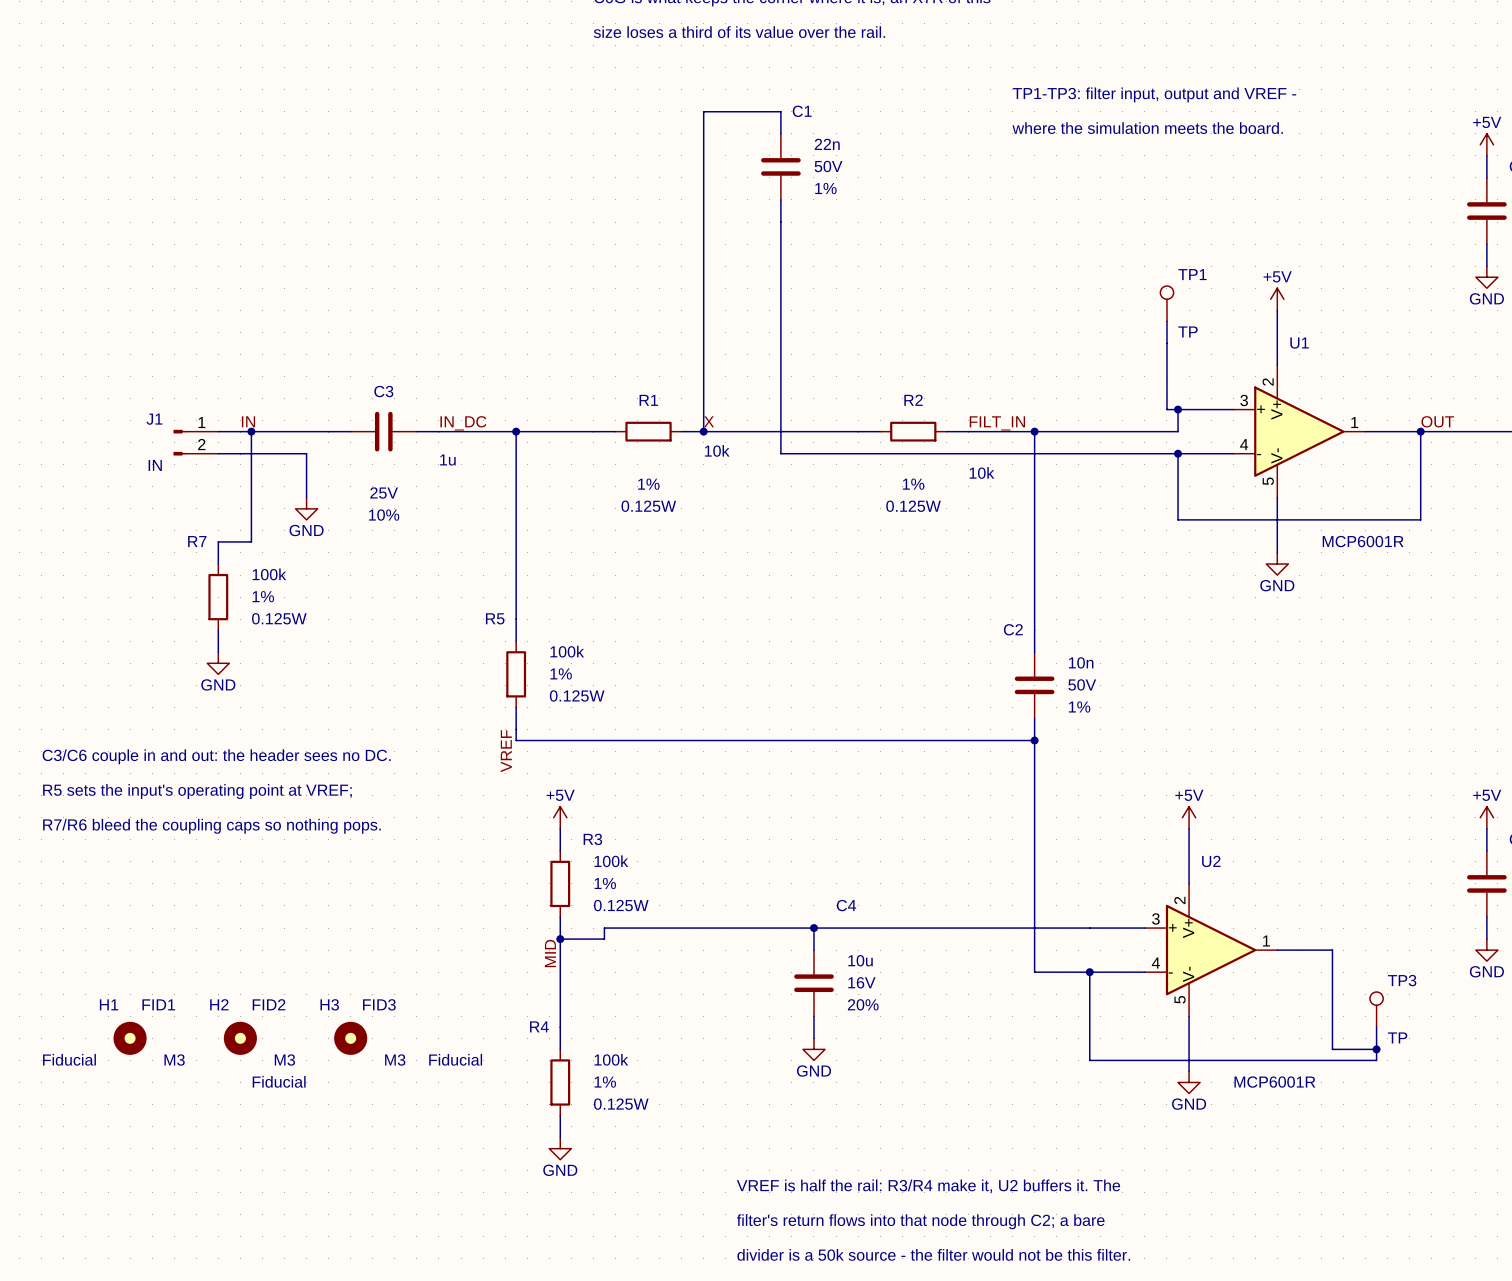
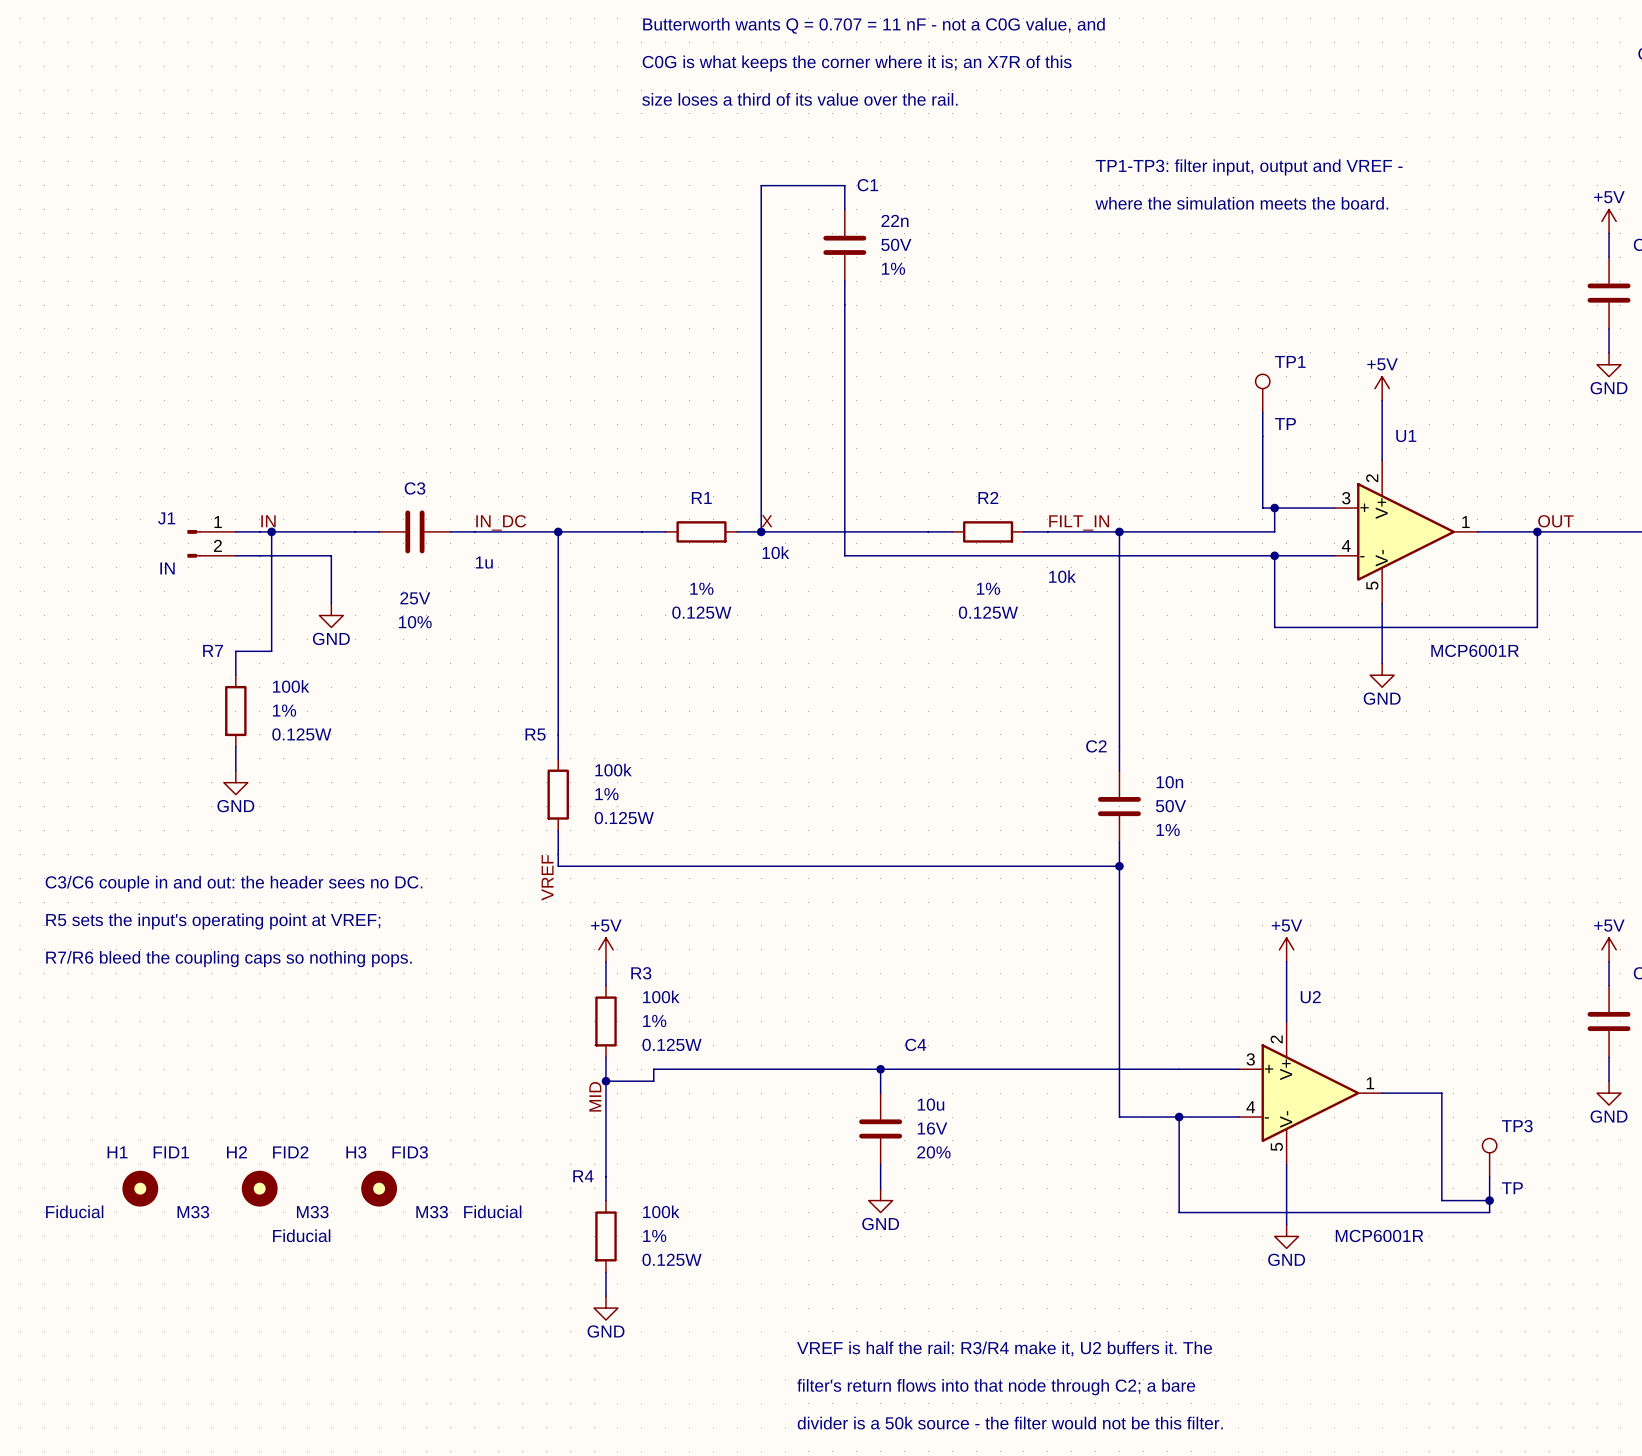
H1 value: M3 (174, 1060) -> M33 (193, 1212)
H2 value: M3 (284, 1060) -> M33 (312, 1212)
H3 value: M3 (395, 1060) -> M33 (432, 1212)

